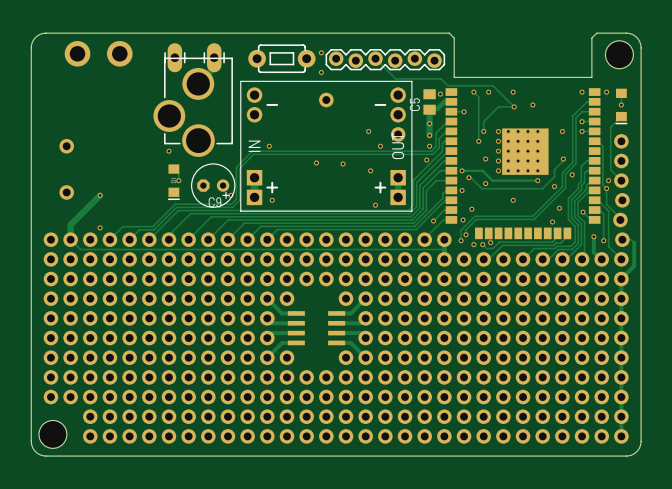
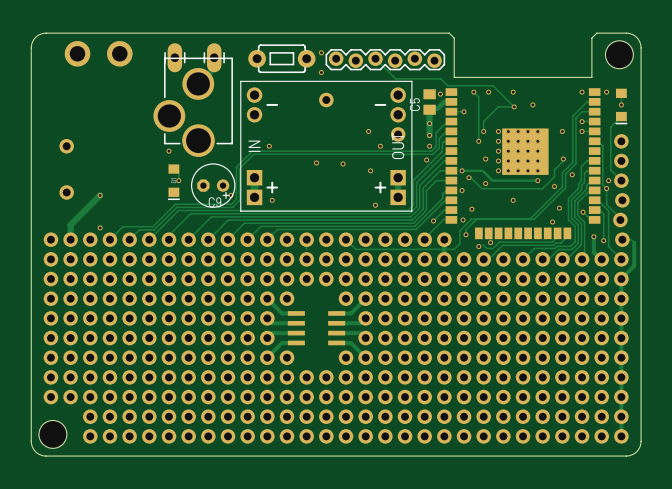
track: (532, 216) (475, 216) (461, 230) (461, 240) -> (532, 216) (529, 219) (471, 219) (459, 230) (459, 243) (454, 249) (355, 249) (346, 239)
track: (70, 239) (80, 249) (444, 249) -> none
via: (461, 240) -> none
via: (473, 244) -> none
via: (482, 244) -> none
via: none -> (478, 246)

